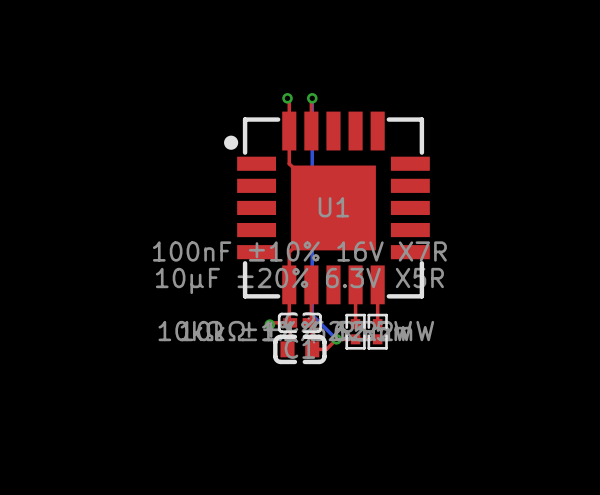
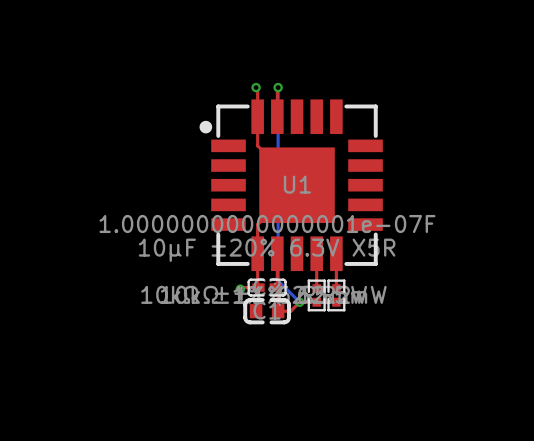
part value: 100nF ±10% 16V X7R (299, 251) -> 1.0000000000000001e-07F (267, 224)

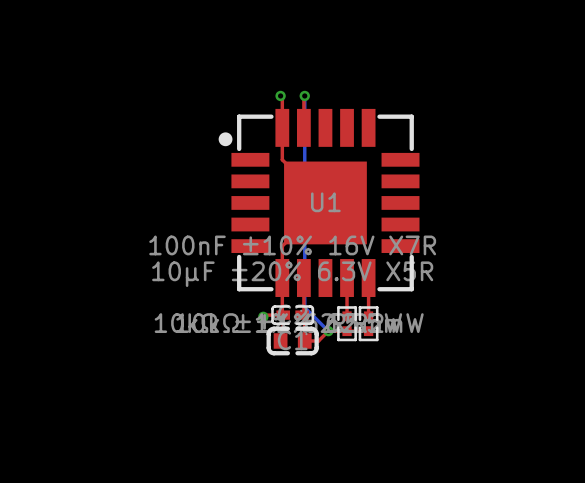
part value: 1.0000000000000001e-07F (267, 224) -> 100nF ±10% 16V X7R (292, 245)

